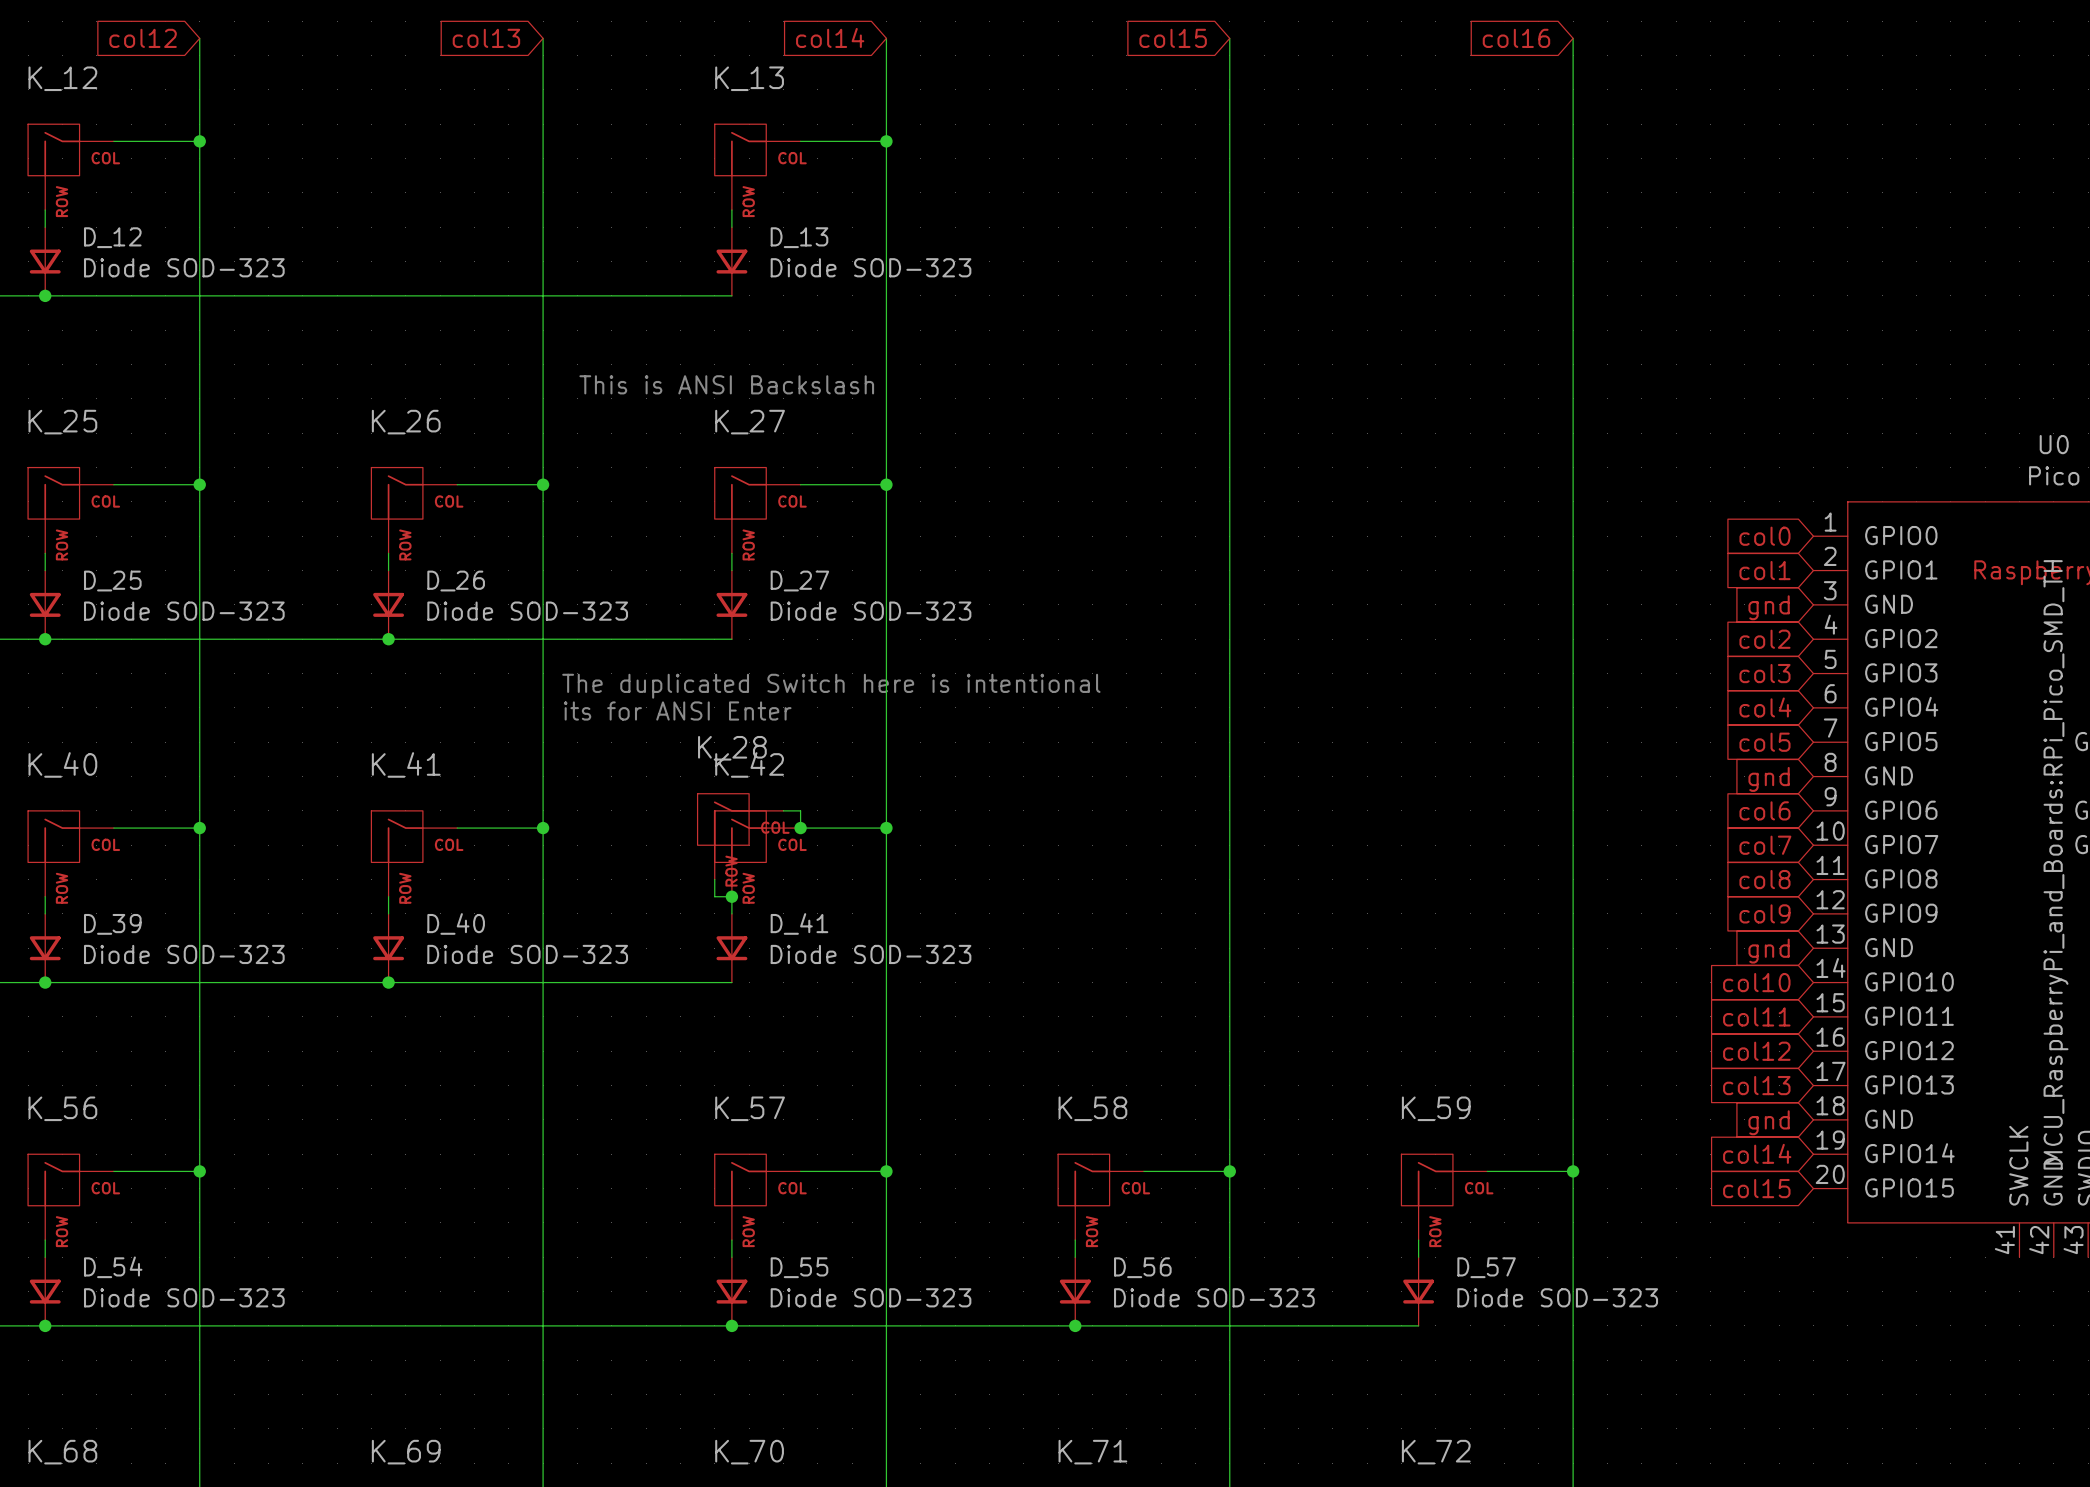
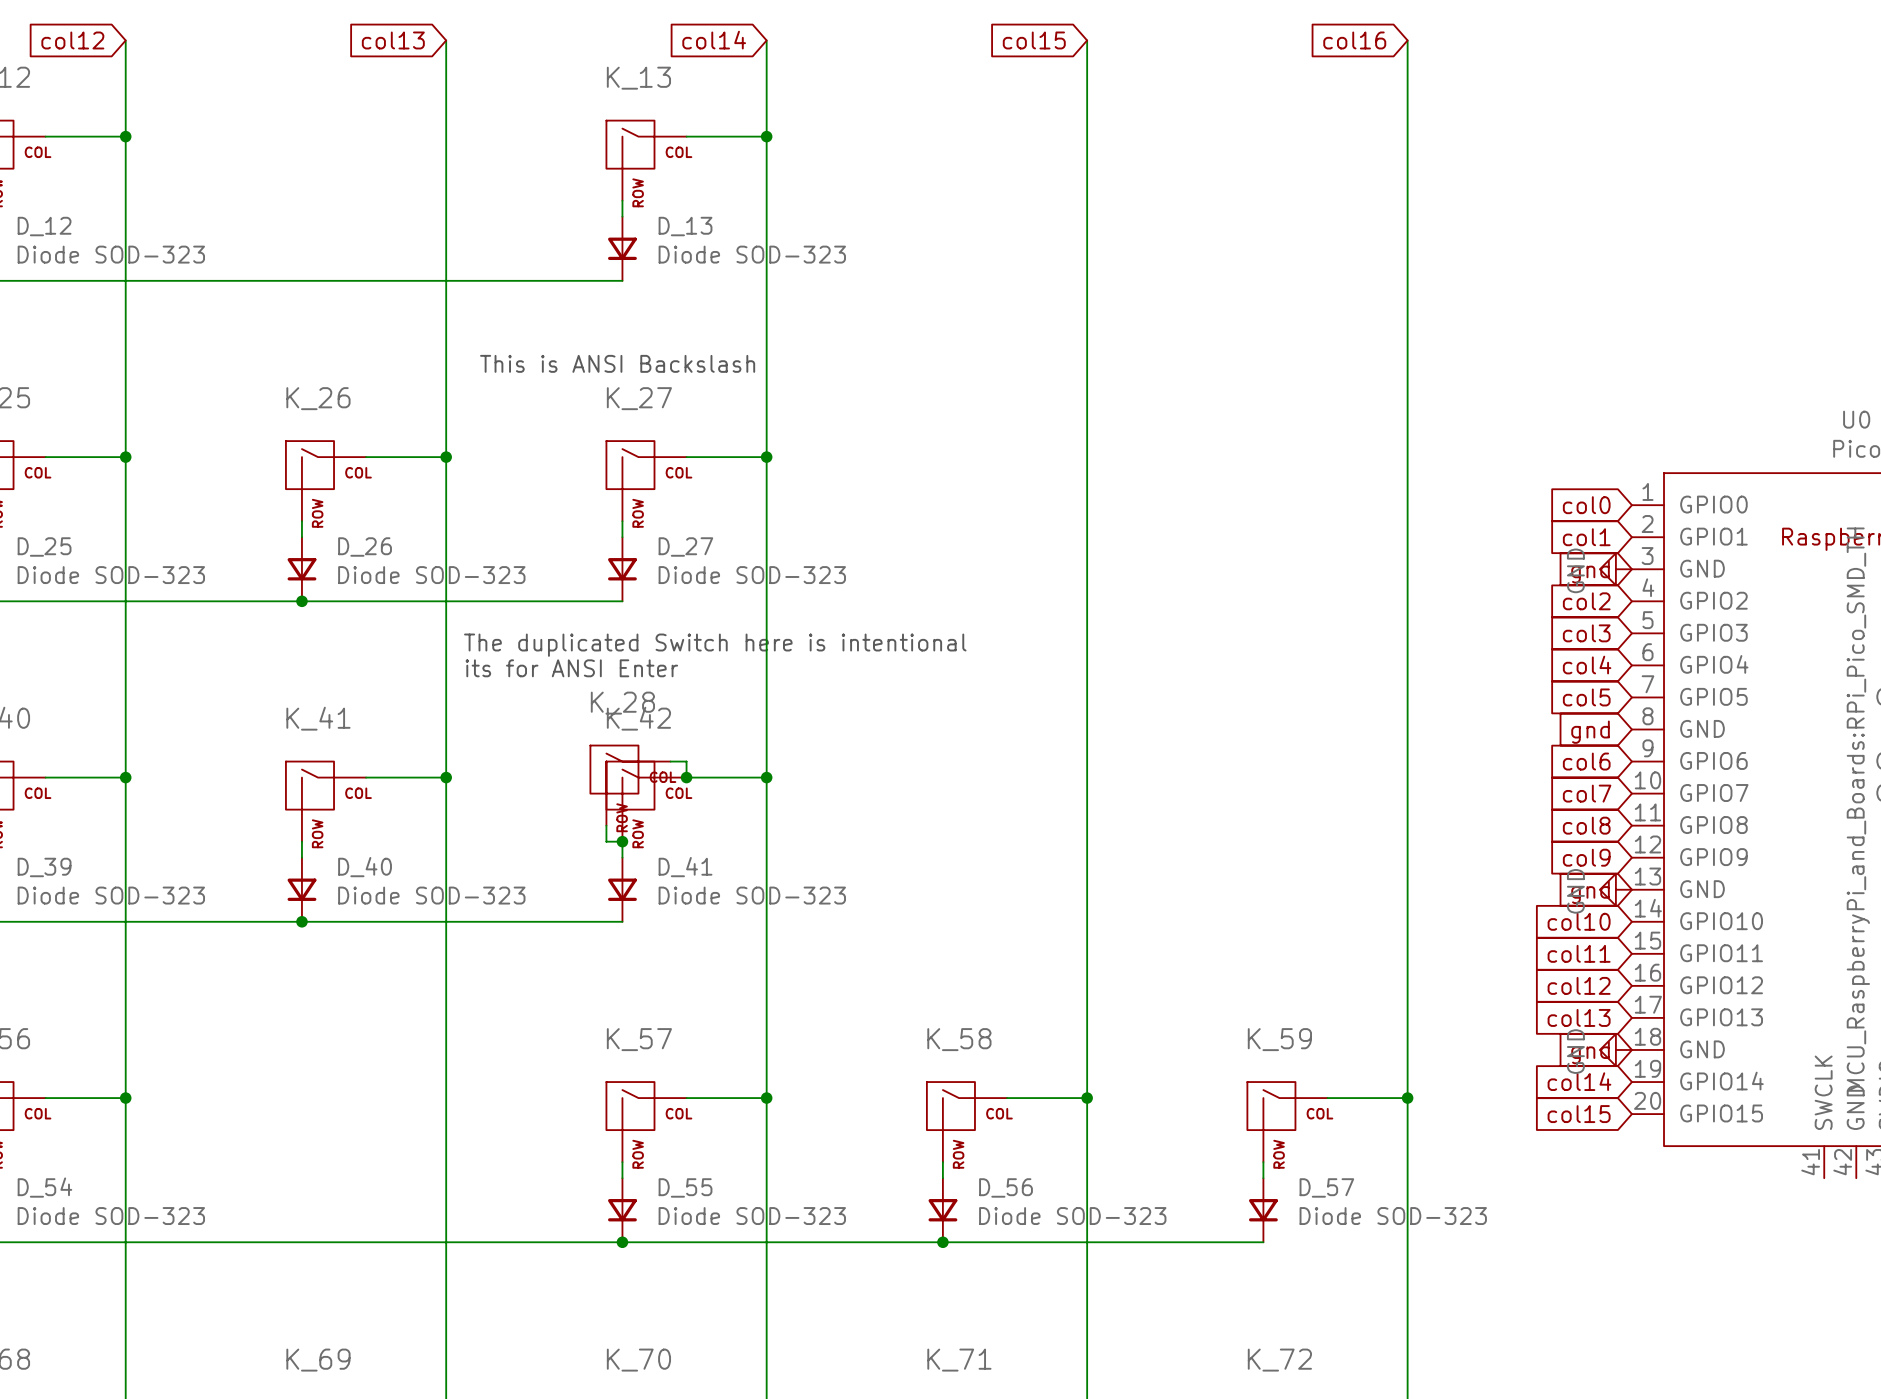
power symbol: none -> GND (1615, 569)
power symbol: none -> GND (1615, 889)
power symbol: none -> GND (1615, 1049)

